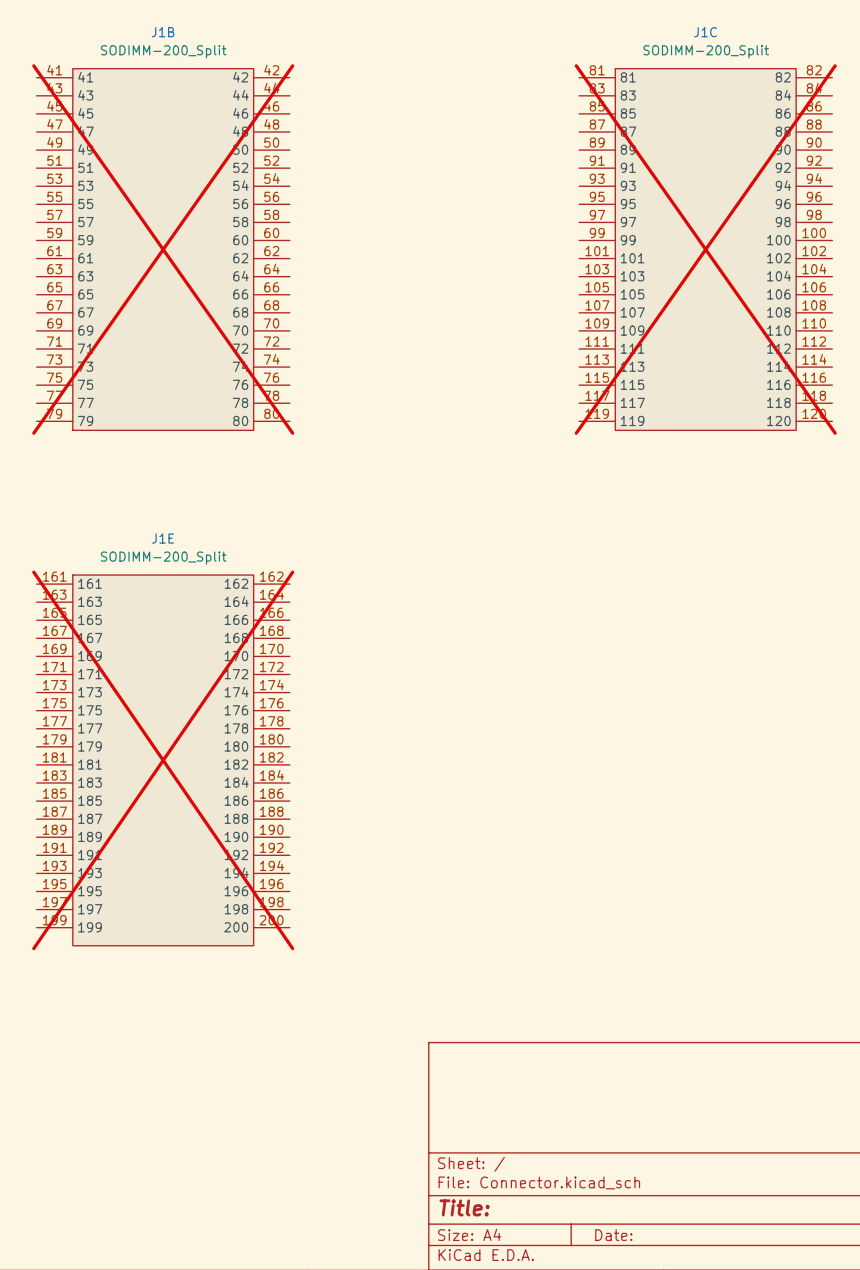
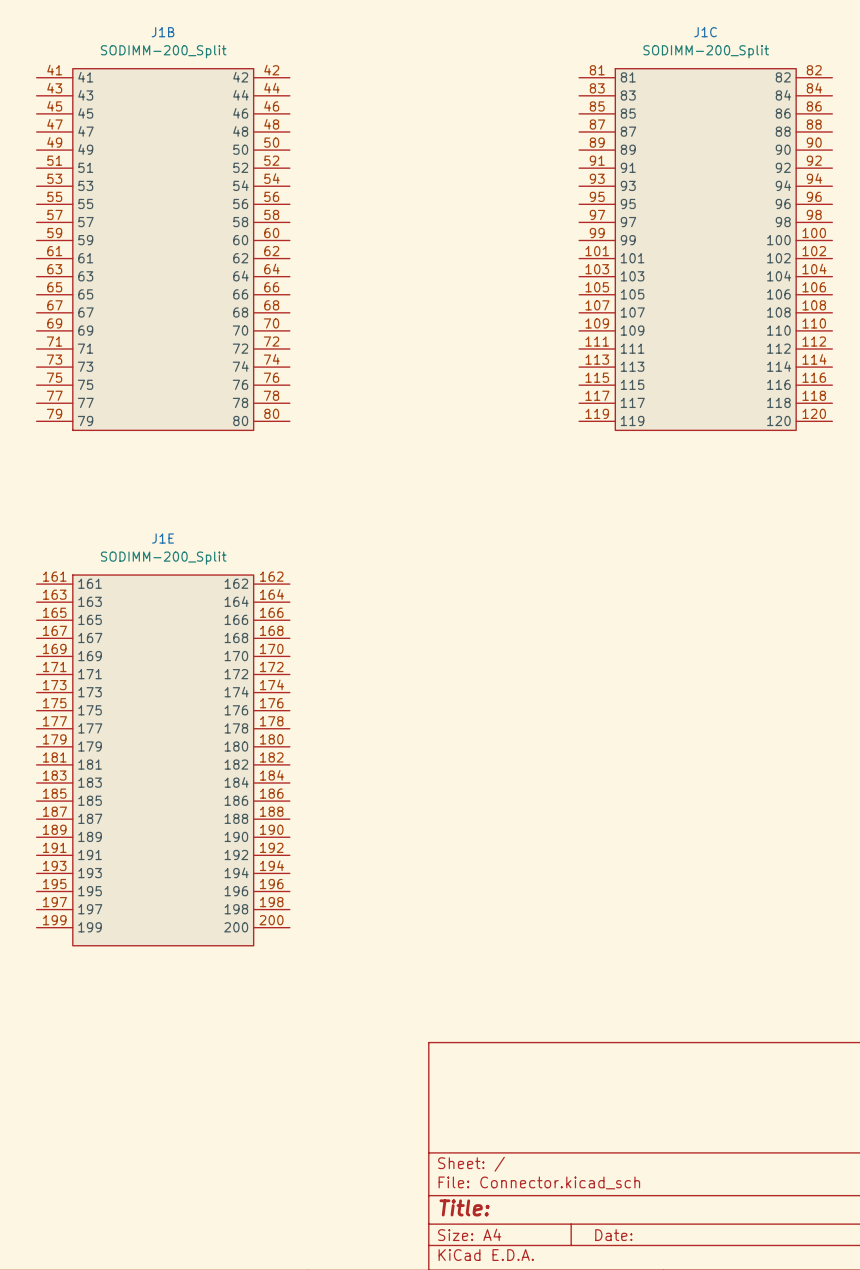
J1B do-not-place cross: (163, 249) -> none
J1C do-not-place cross: (705, 249) -> none
J1E do-not-place cross: (163, 760) -> none

